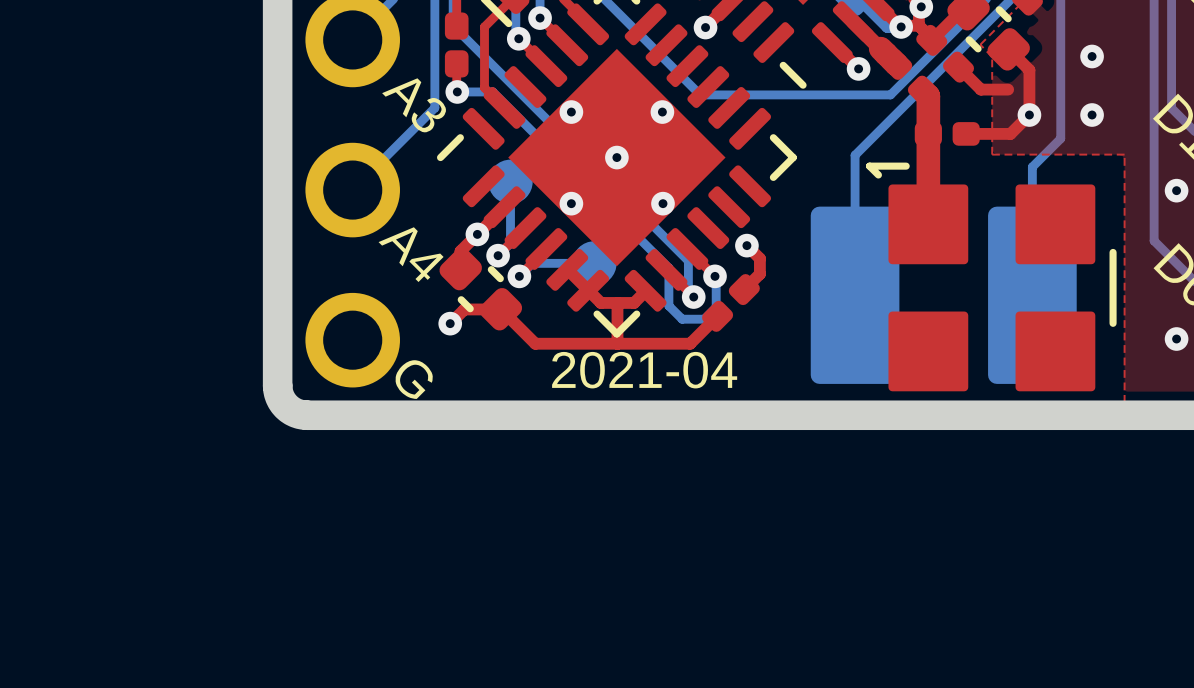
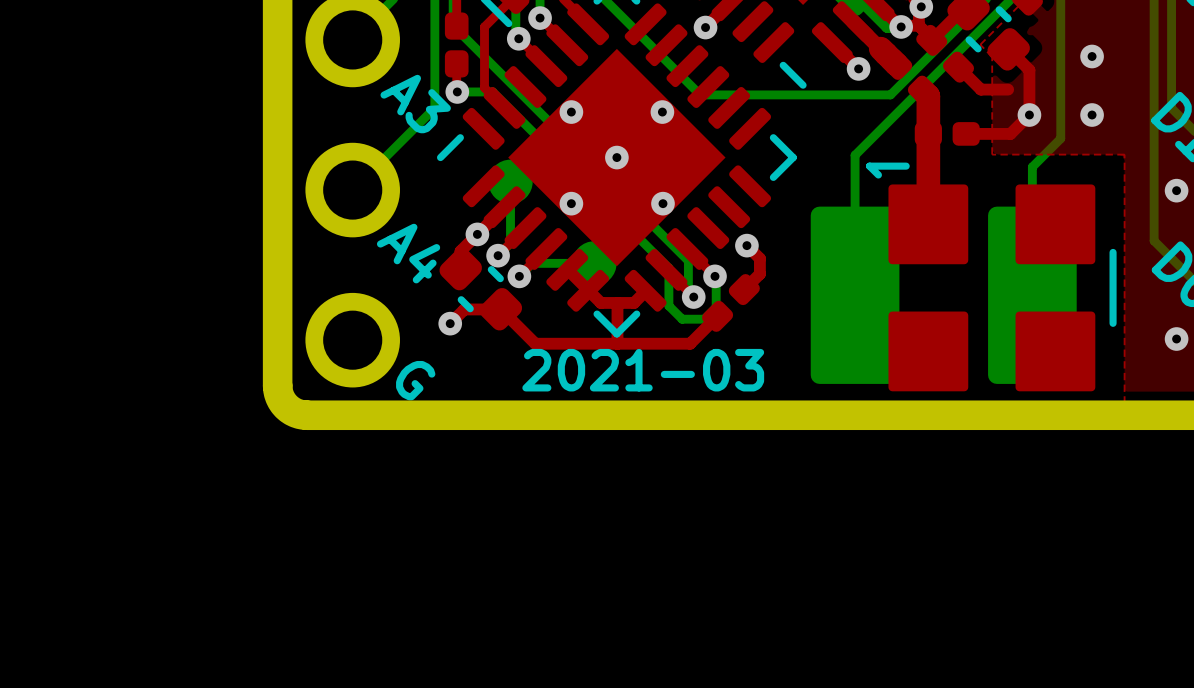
text: 2021-04 (644, 370) -> 2021-03 (643, 370)

